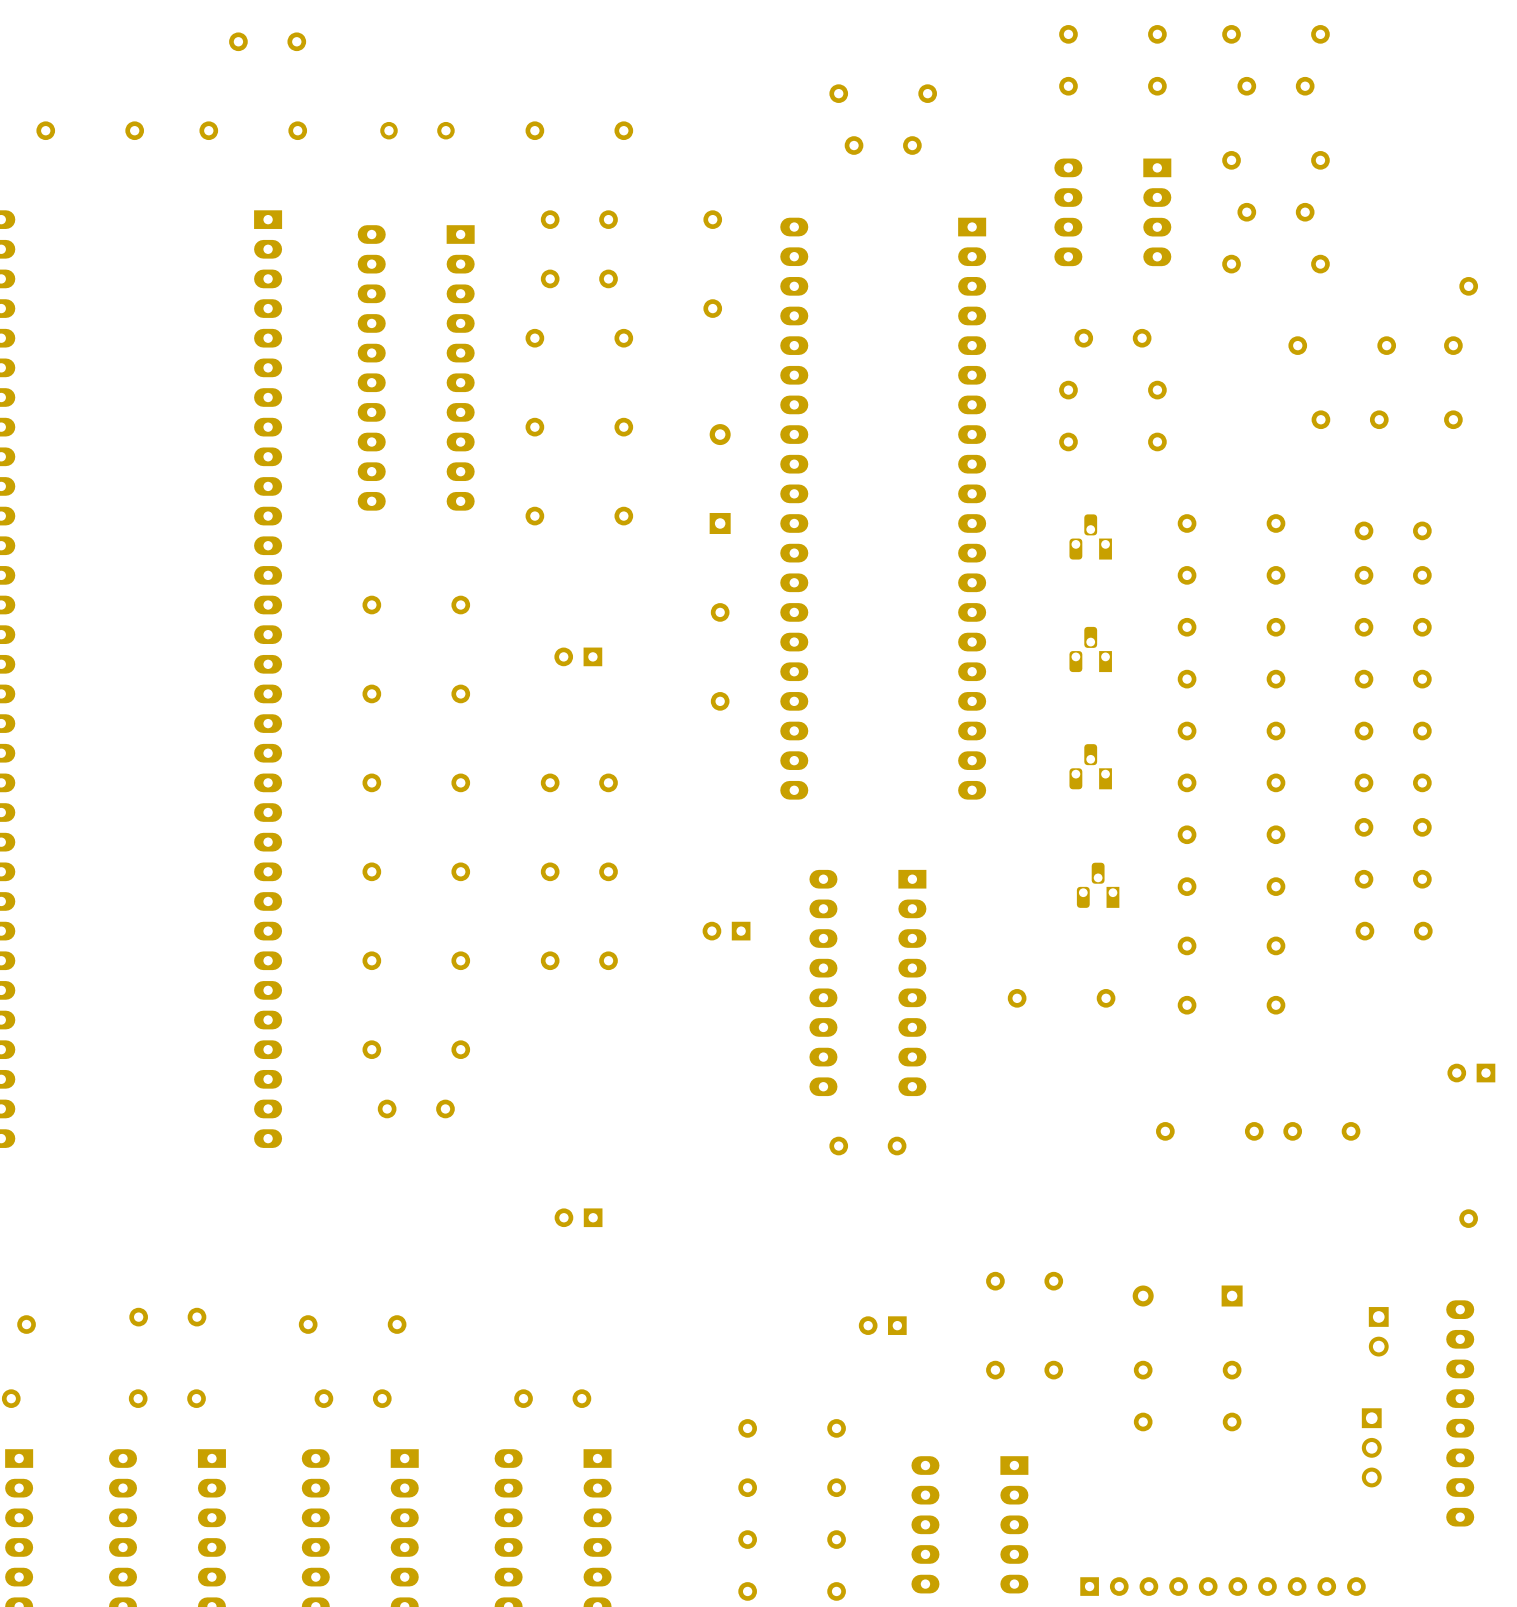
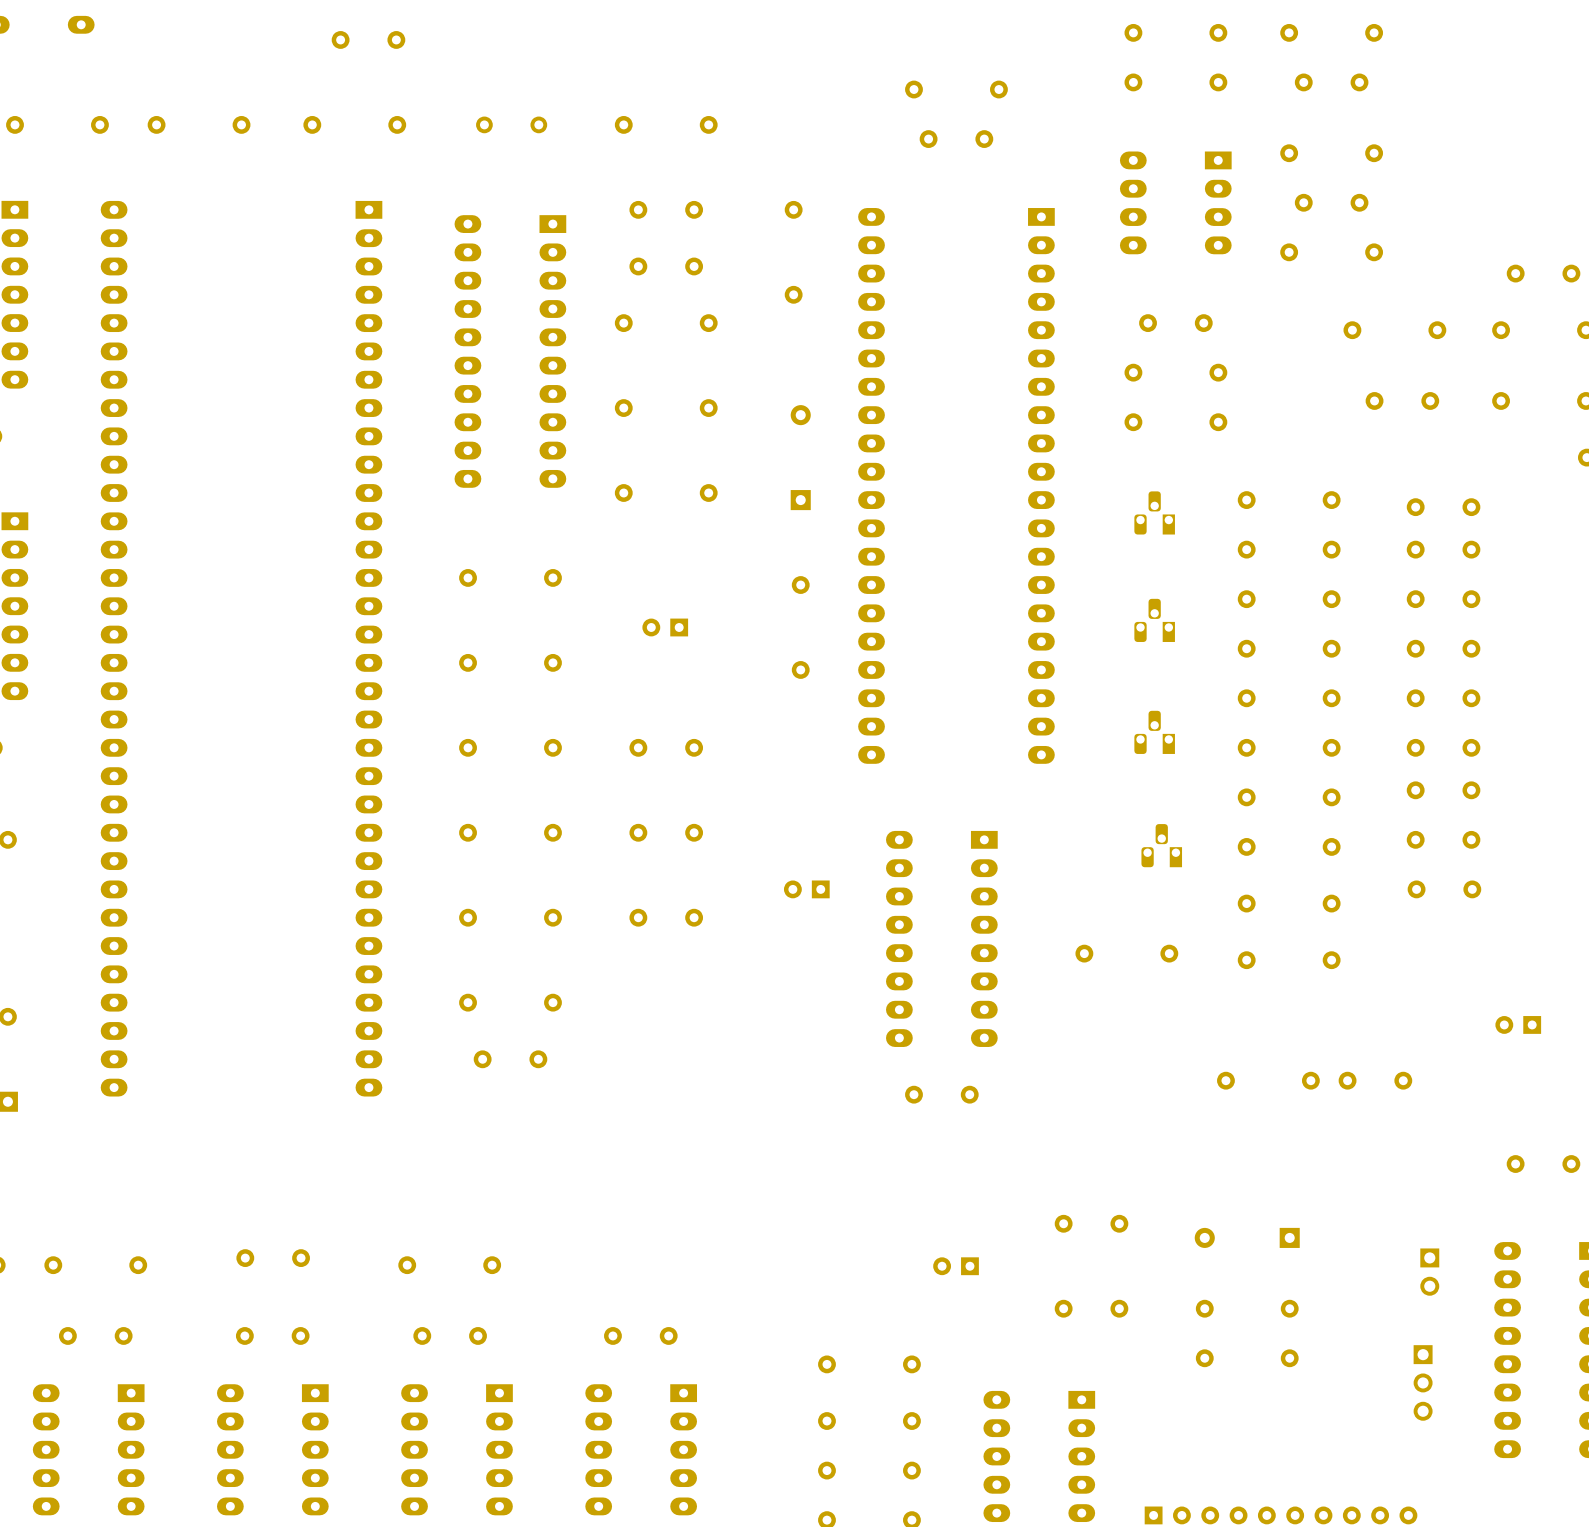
part: (578, 1217) -> none

